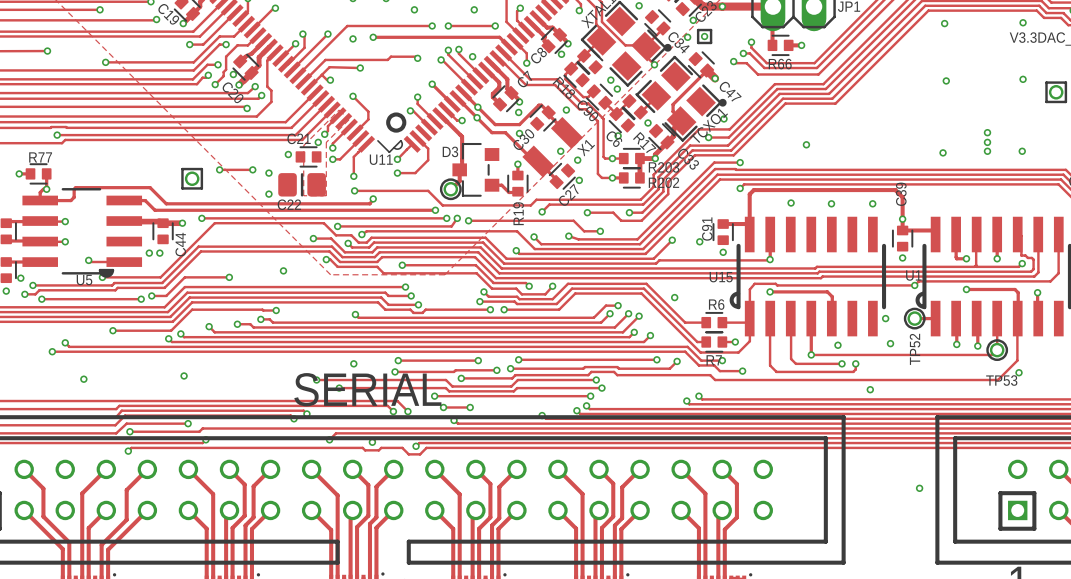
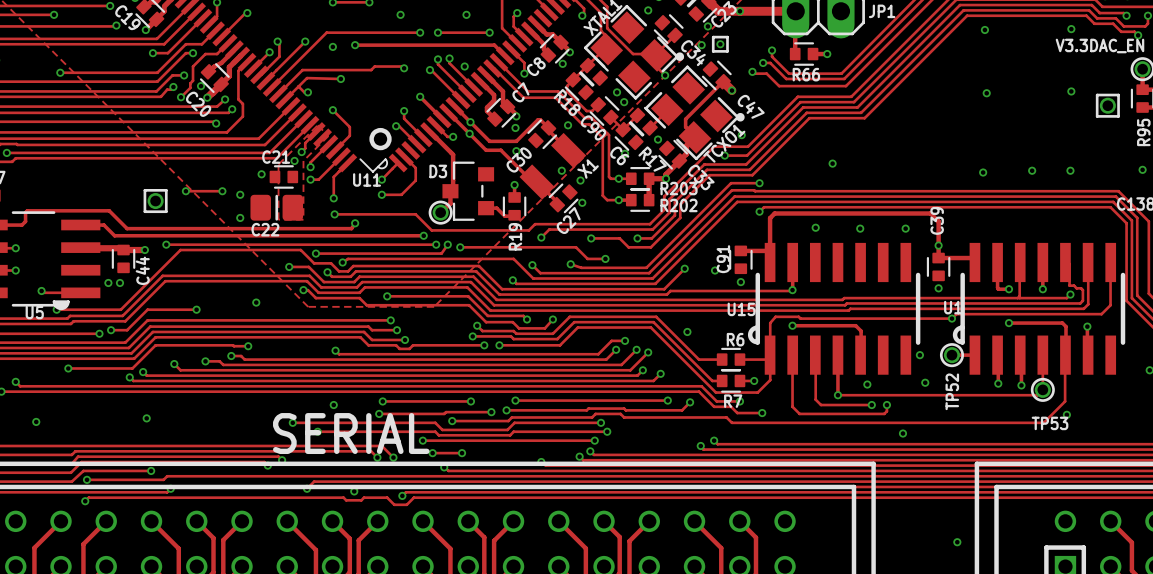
via: (987, 132) -> none
via: (987, 142) -> none

